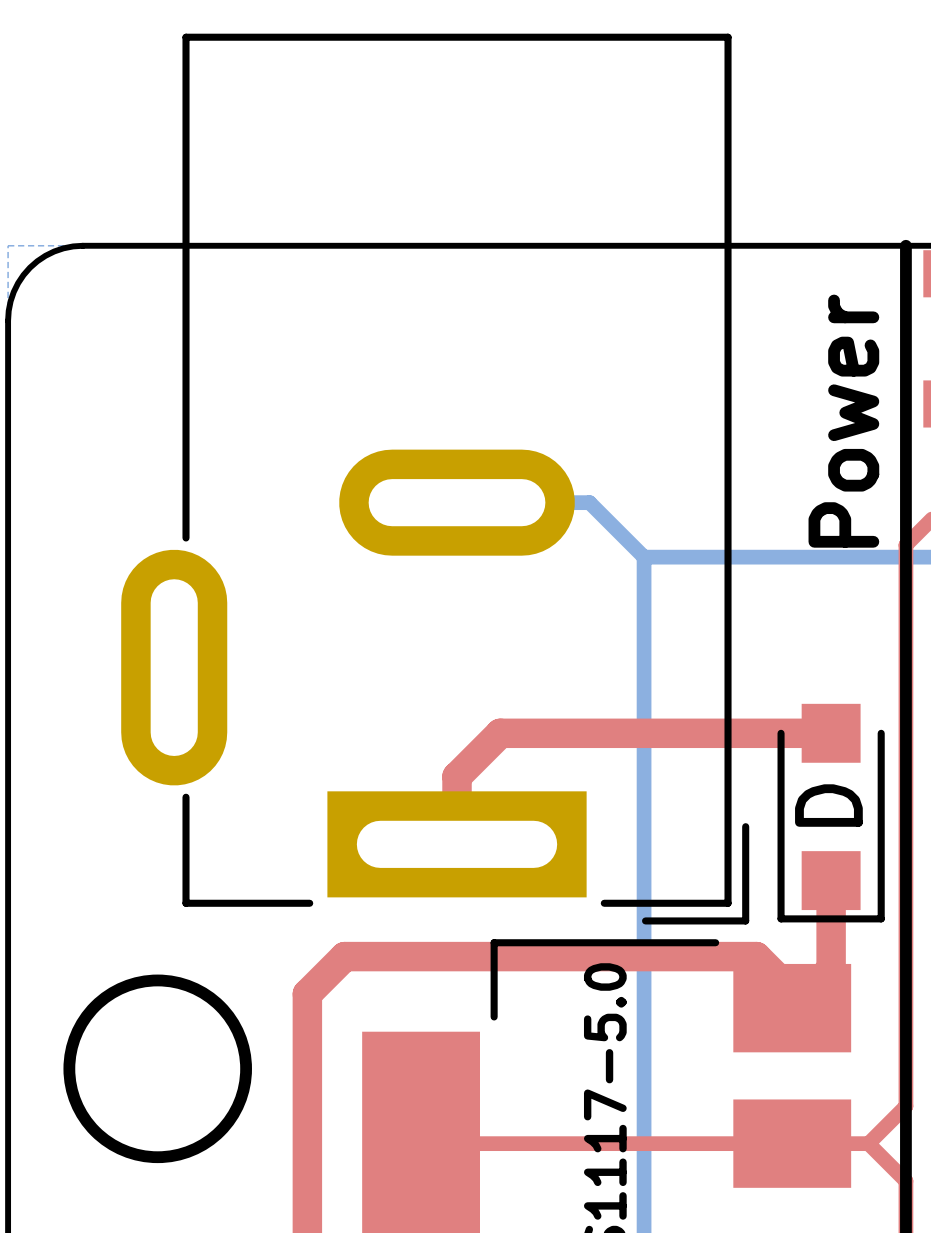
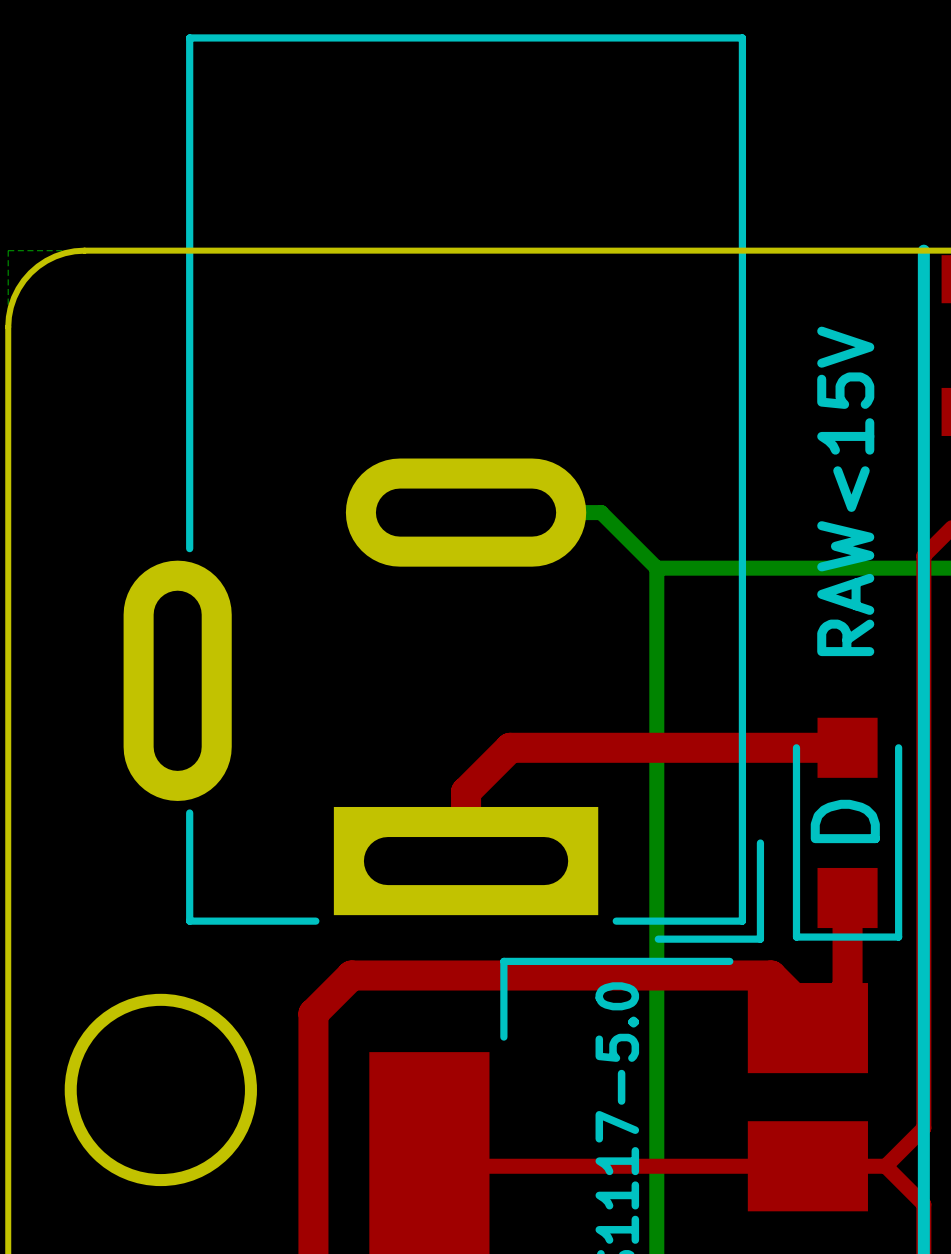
text: Power (843, 421) -> none
text: none -> RAW<15V (845, 491)

